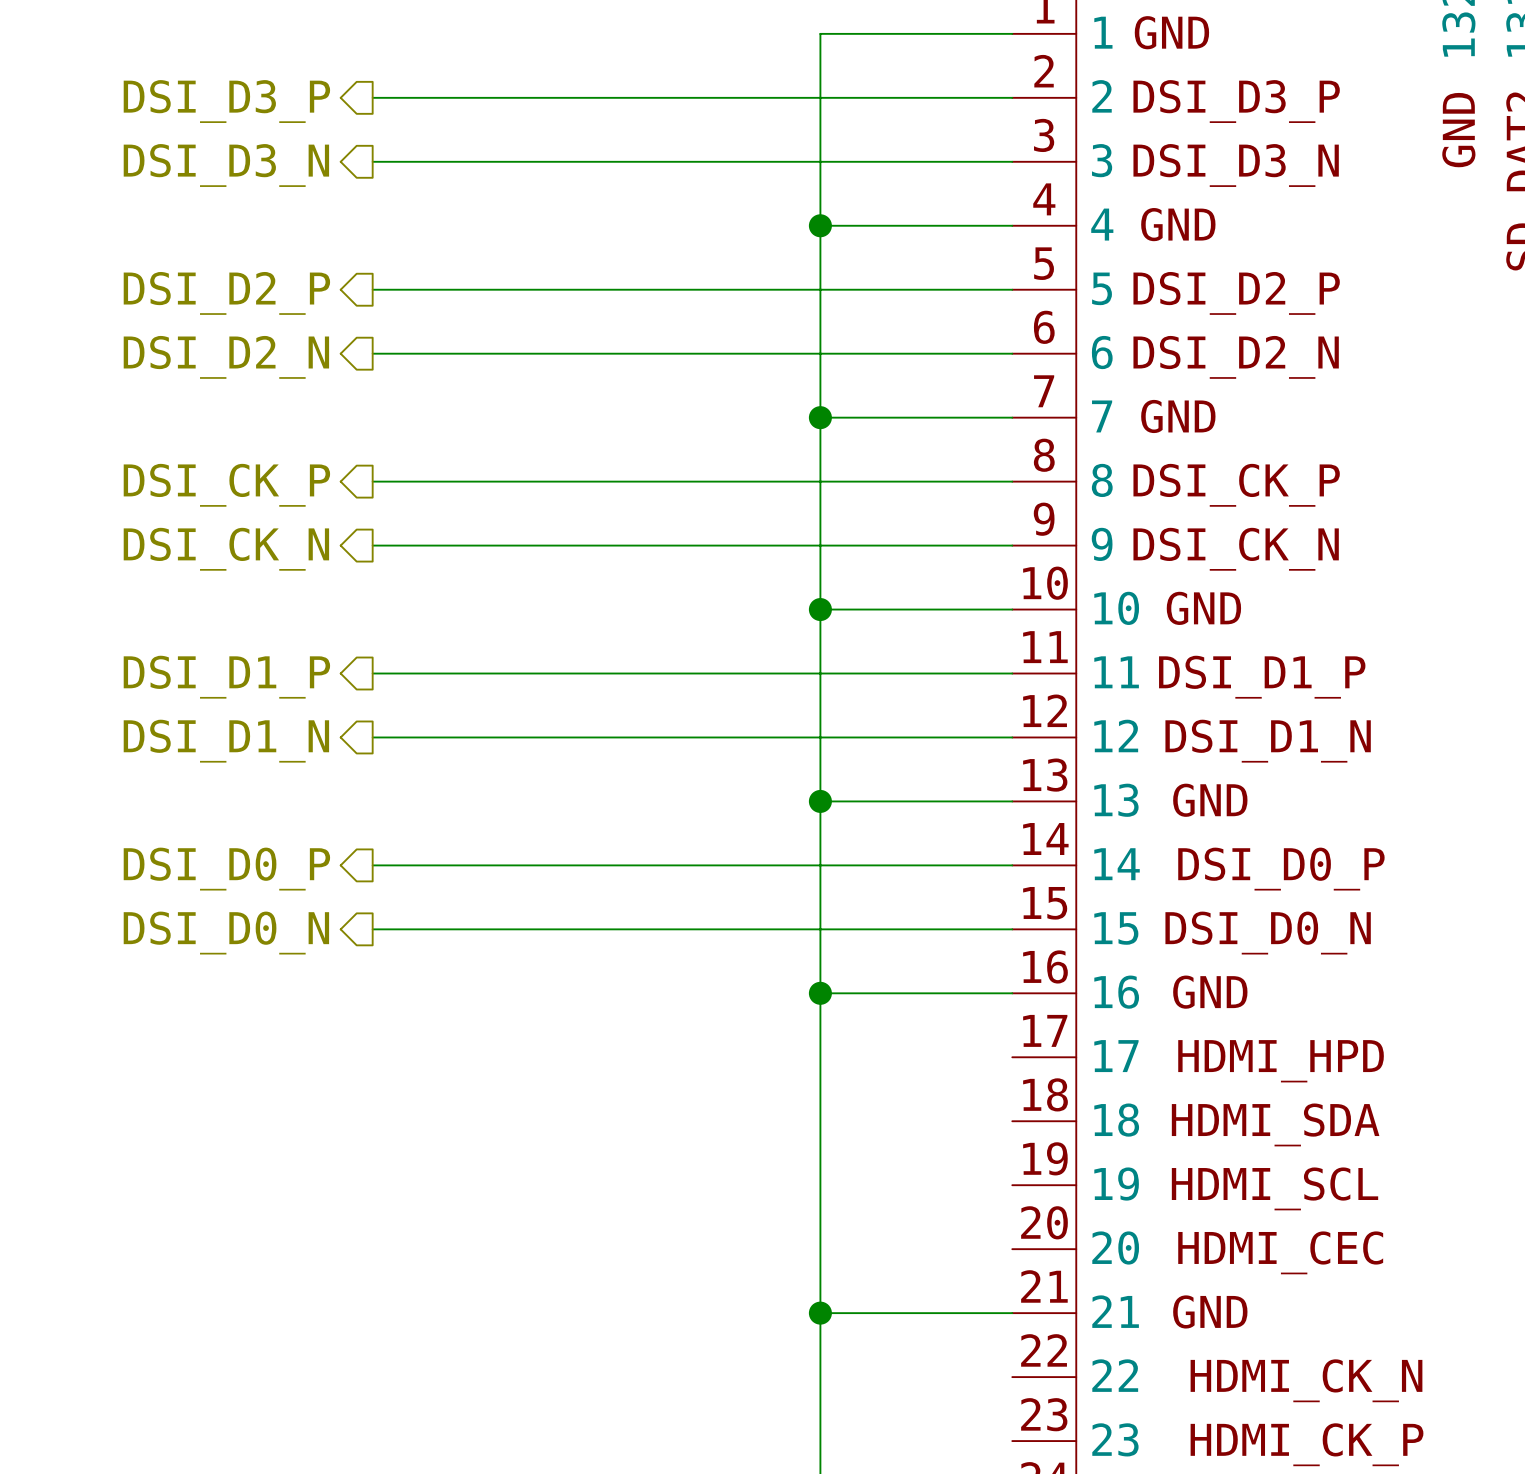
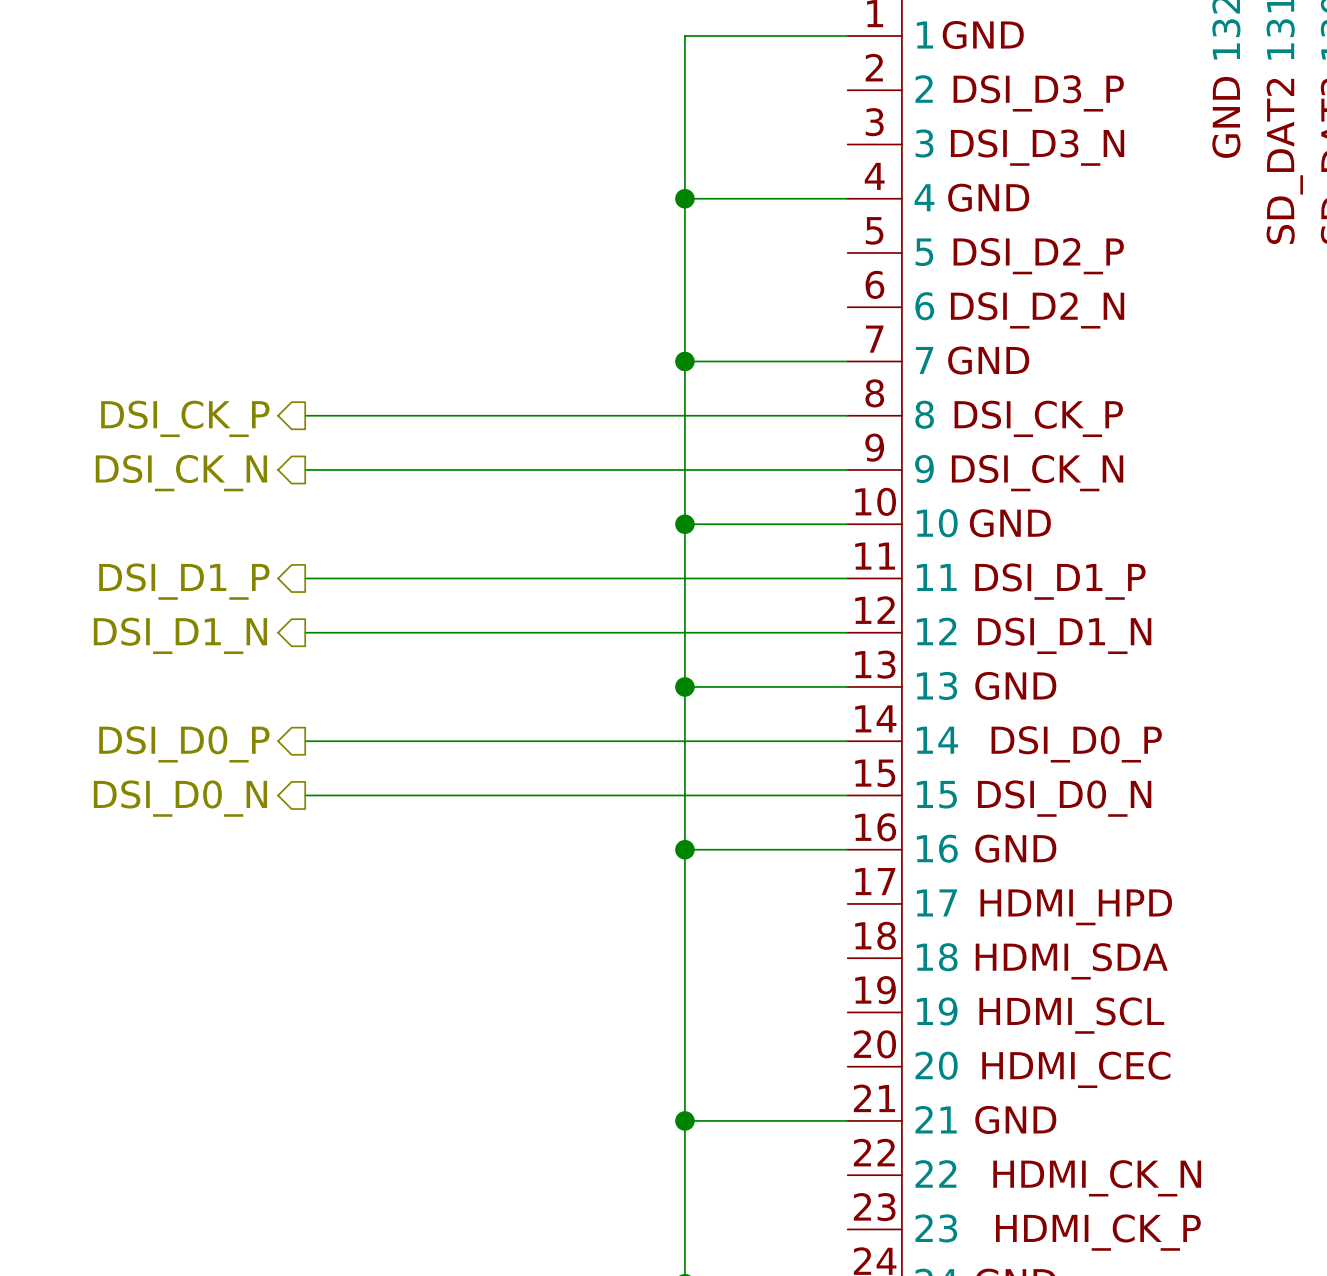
wire: (372, 97) (1012, 97) -> none
hierarchical label: DSI_D3_P (226, 101) -> none
wire: (372, 161) (1012, 161) -> none
hierarchical label: DSI_D3_N (226, 165) -> none
wire: (372, 289) (1012, 289) -> none
hierarchical label: DSI_D2_P (226, 293) -> none
wire: (372, 353) (1012, 353) -> none
hierarchical label: DSI_D2_N (226, 357) -> none

